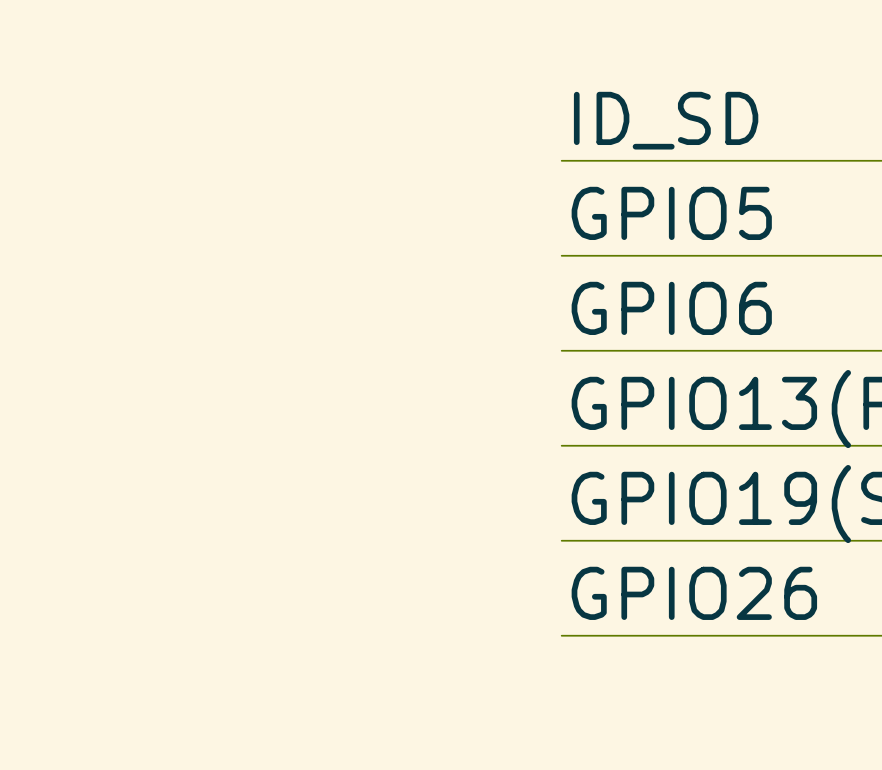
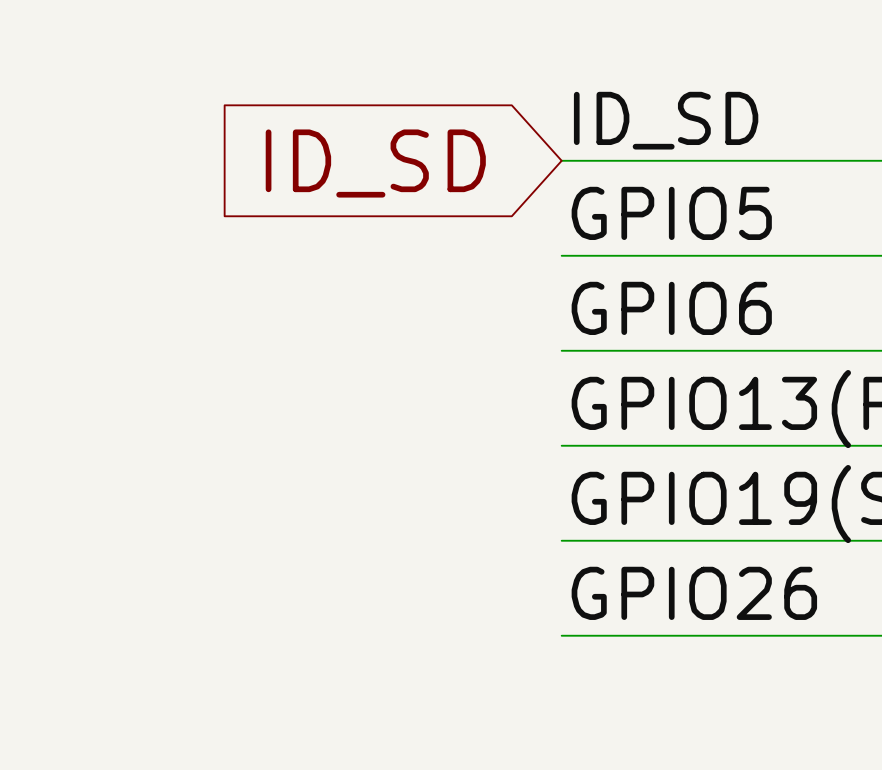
global label: none -> ID_SD (375, 163)

